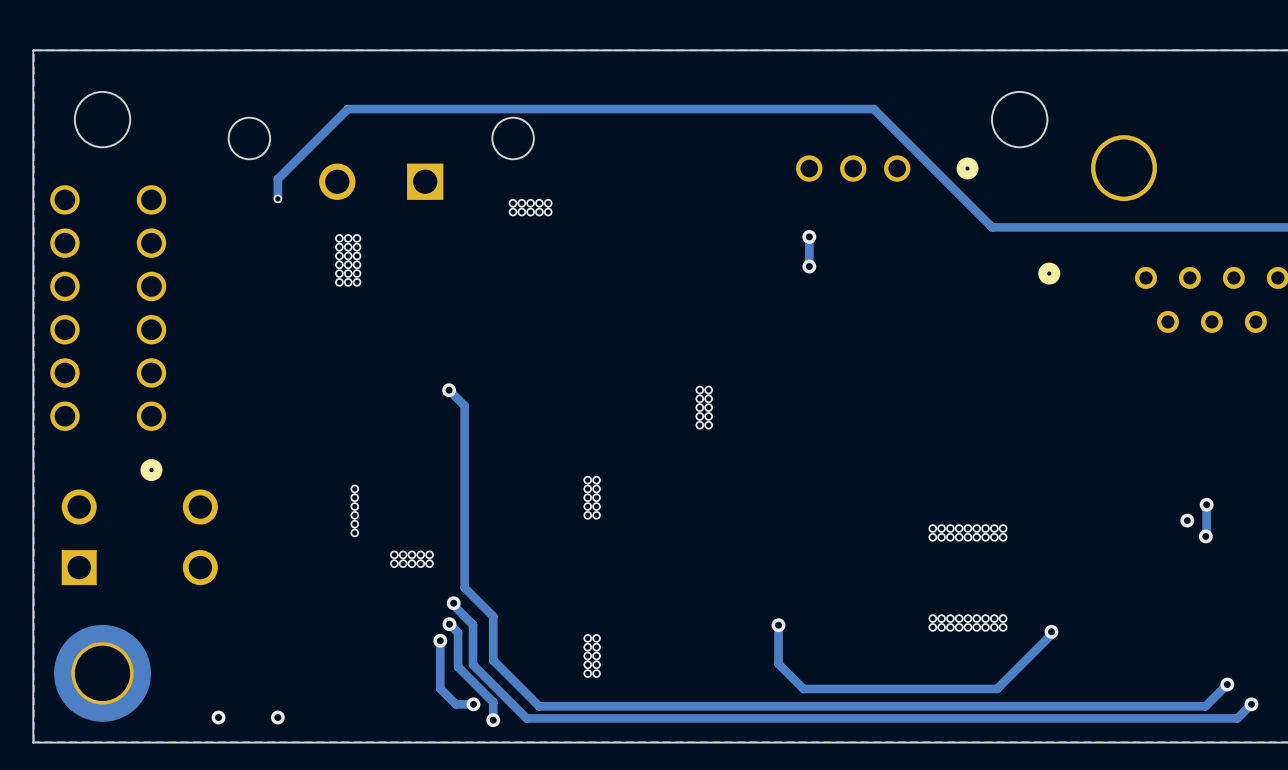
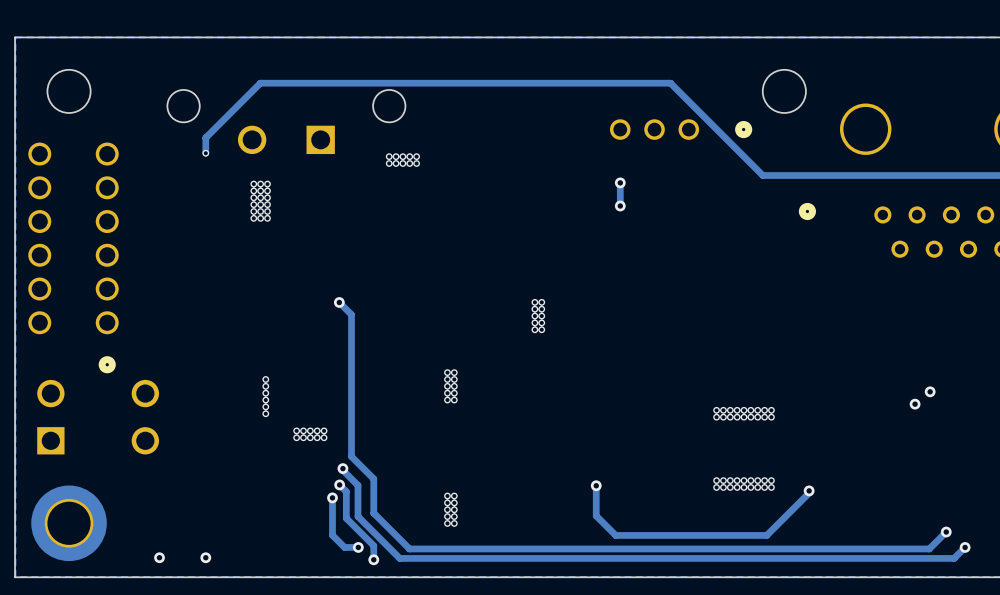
track: (1206, 504) (1205, 536) -> none
via: (1205, 536) -> none

